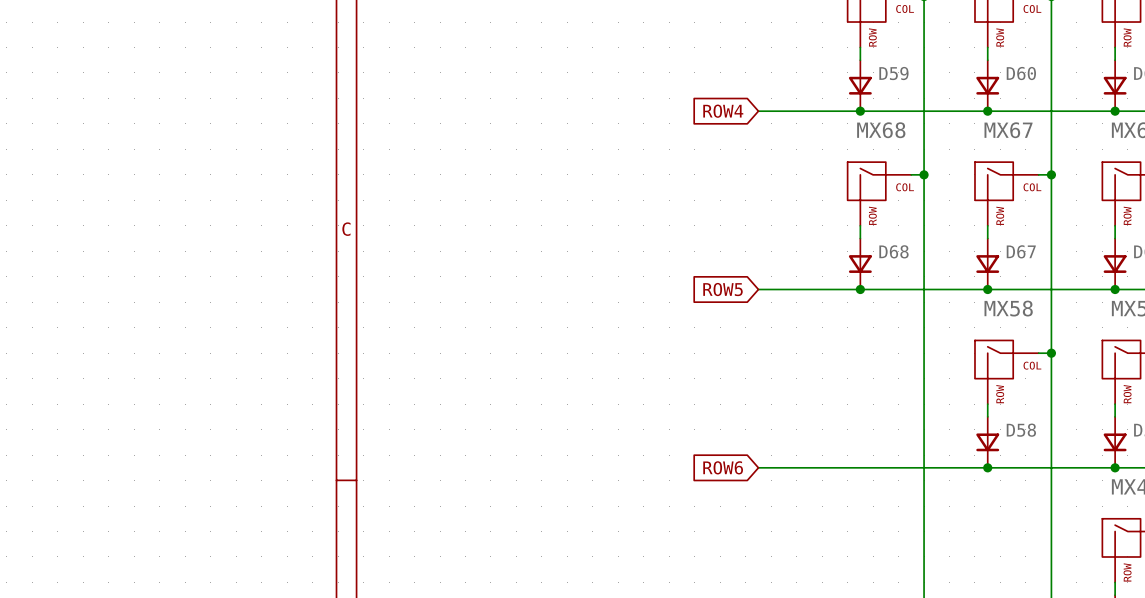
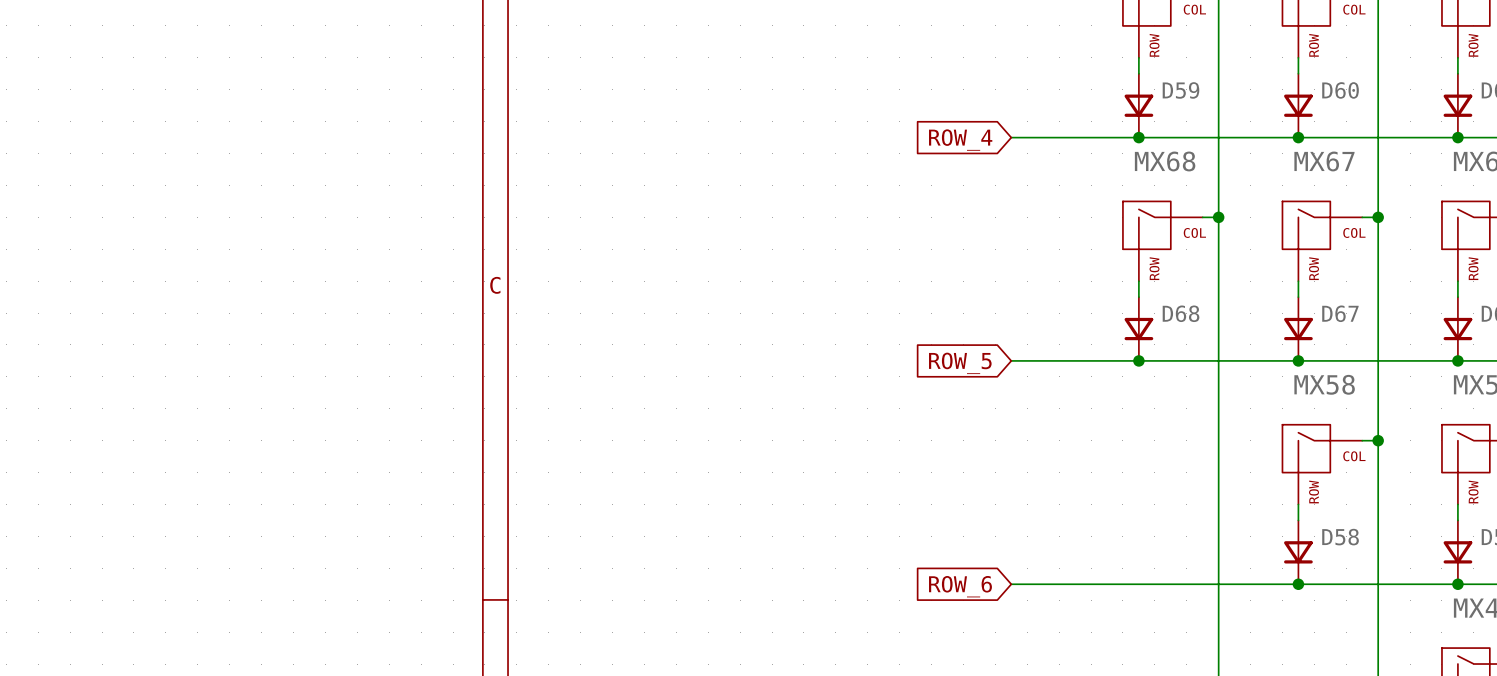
global label: ROW4 (723, 111) -> ROW_4 (960, 140)
global label: ROW5 (722, 289) -> ROW_5 (960, 363)
global label: ROW6 (723, 467) -> ROW_6 (960, 586)

